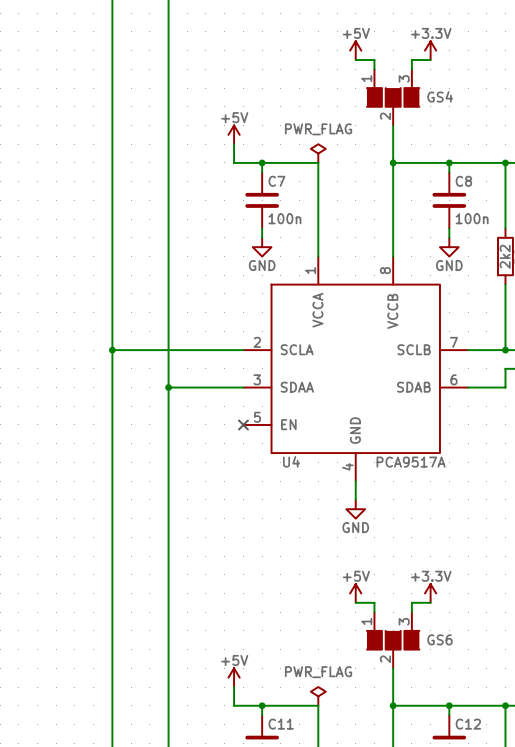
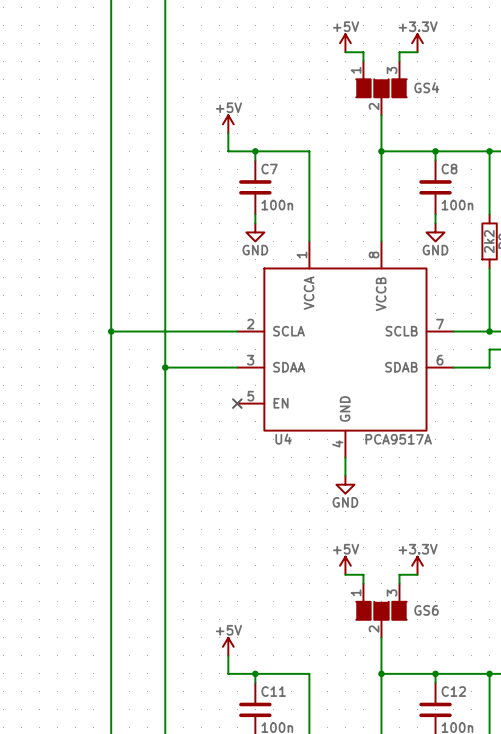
power symbol: PWR_FLAG (318, 153) -> none
power symbol: PWR_FLAG (318, 696) -> none

